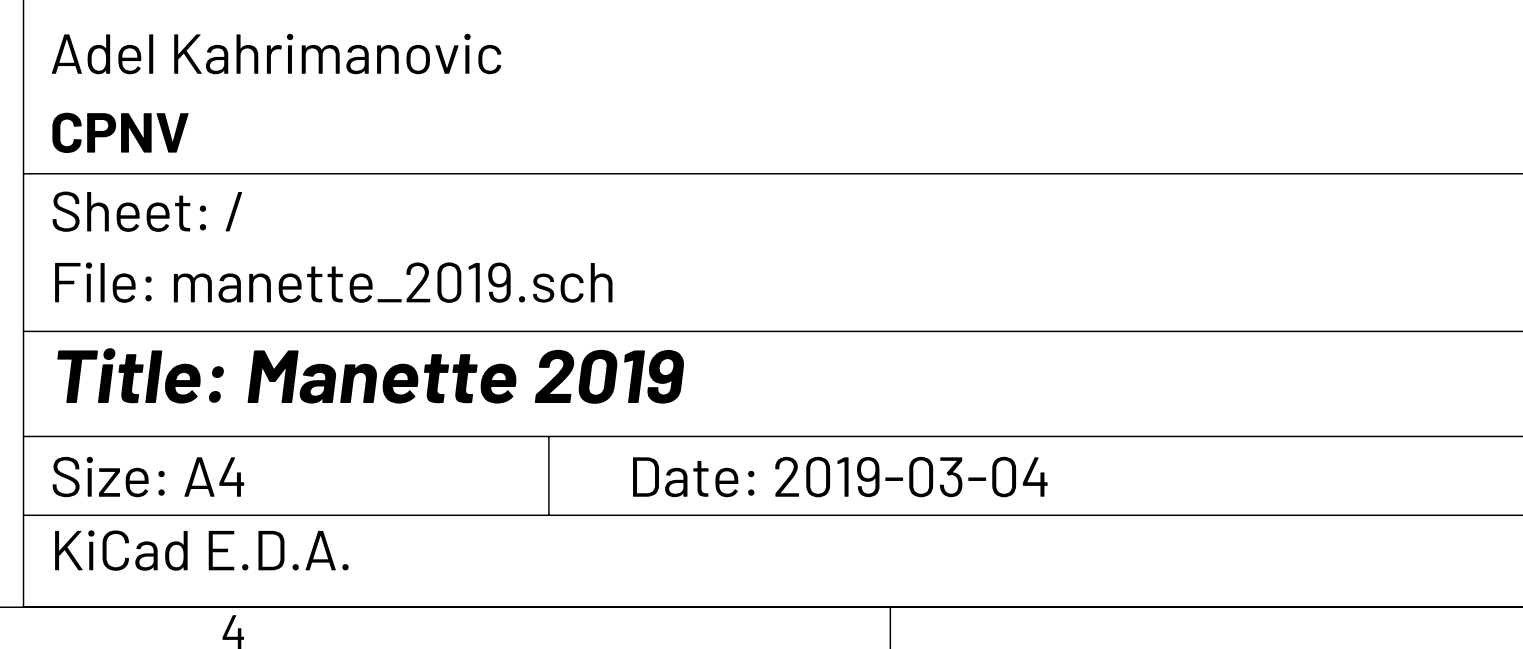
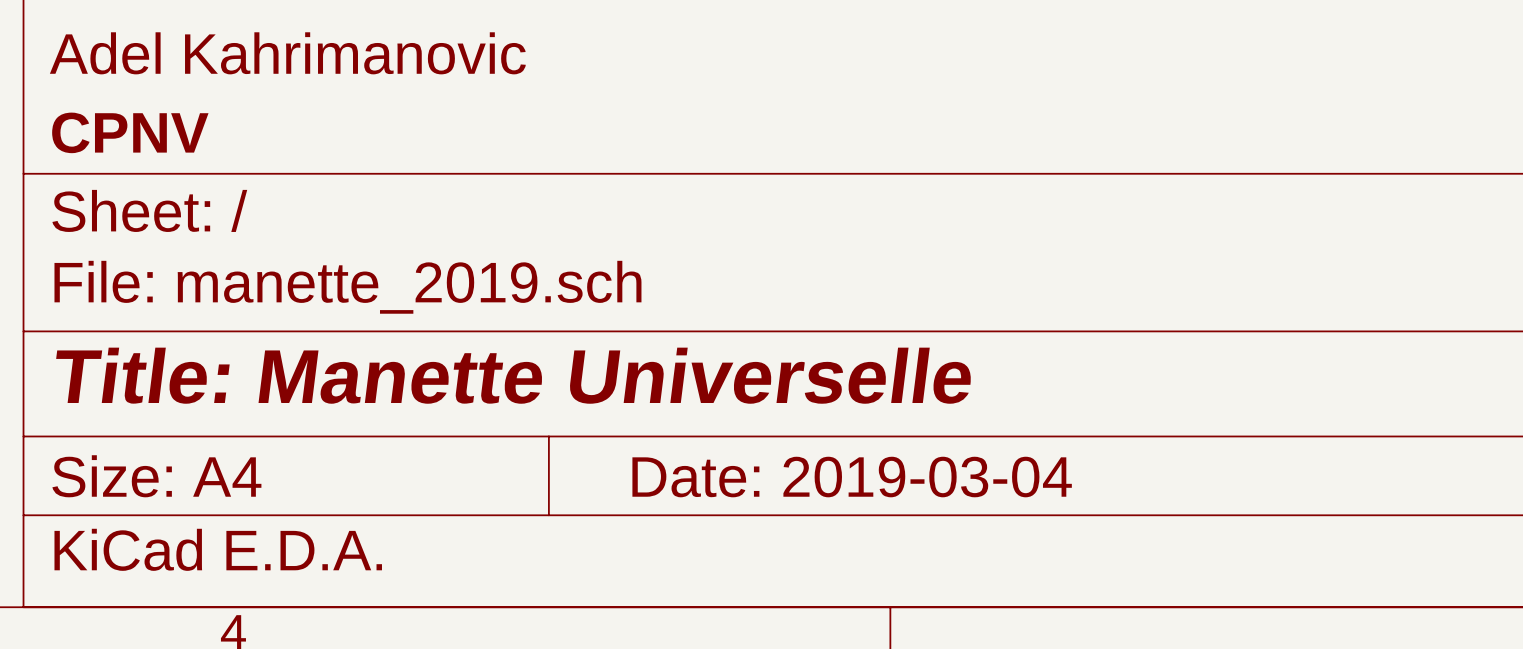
title block: Title: Manette 2019 (370, 376) -> Title: Manette Universelle (513, 375)

